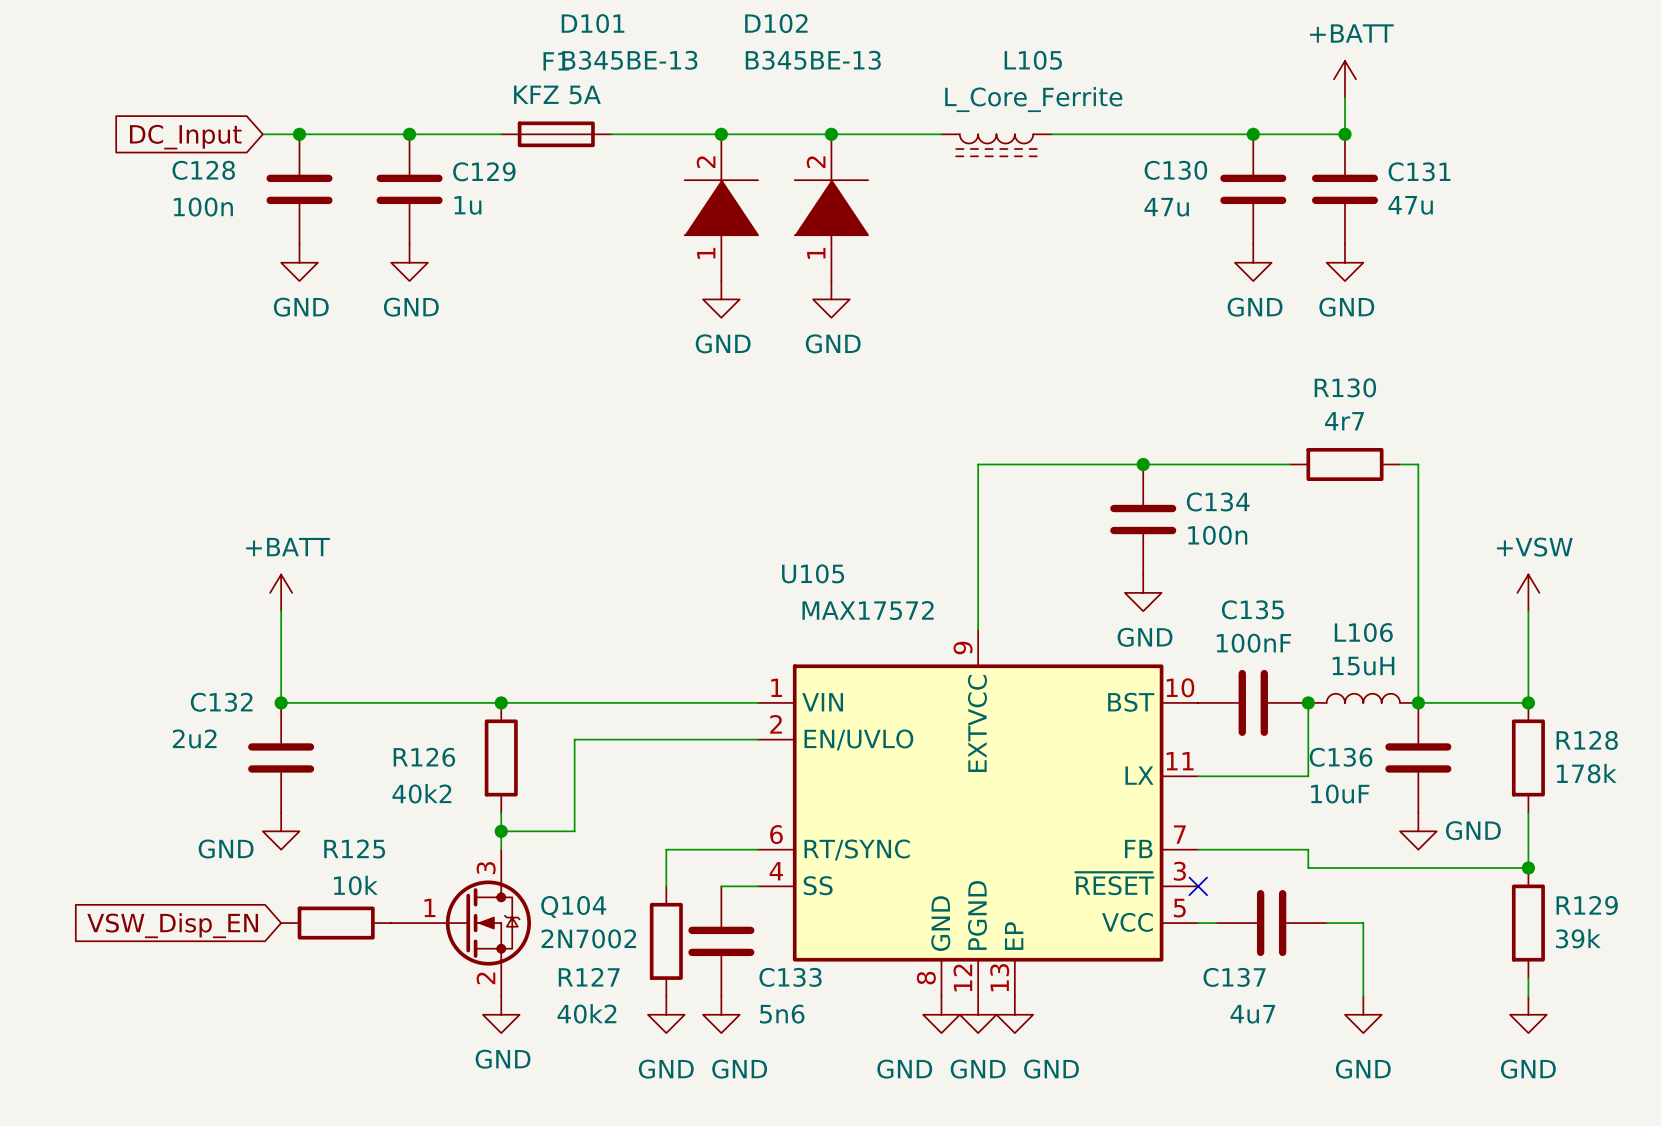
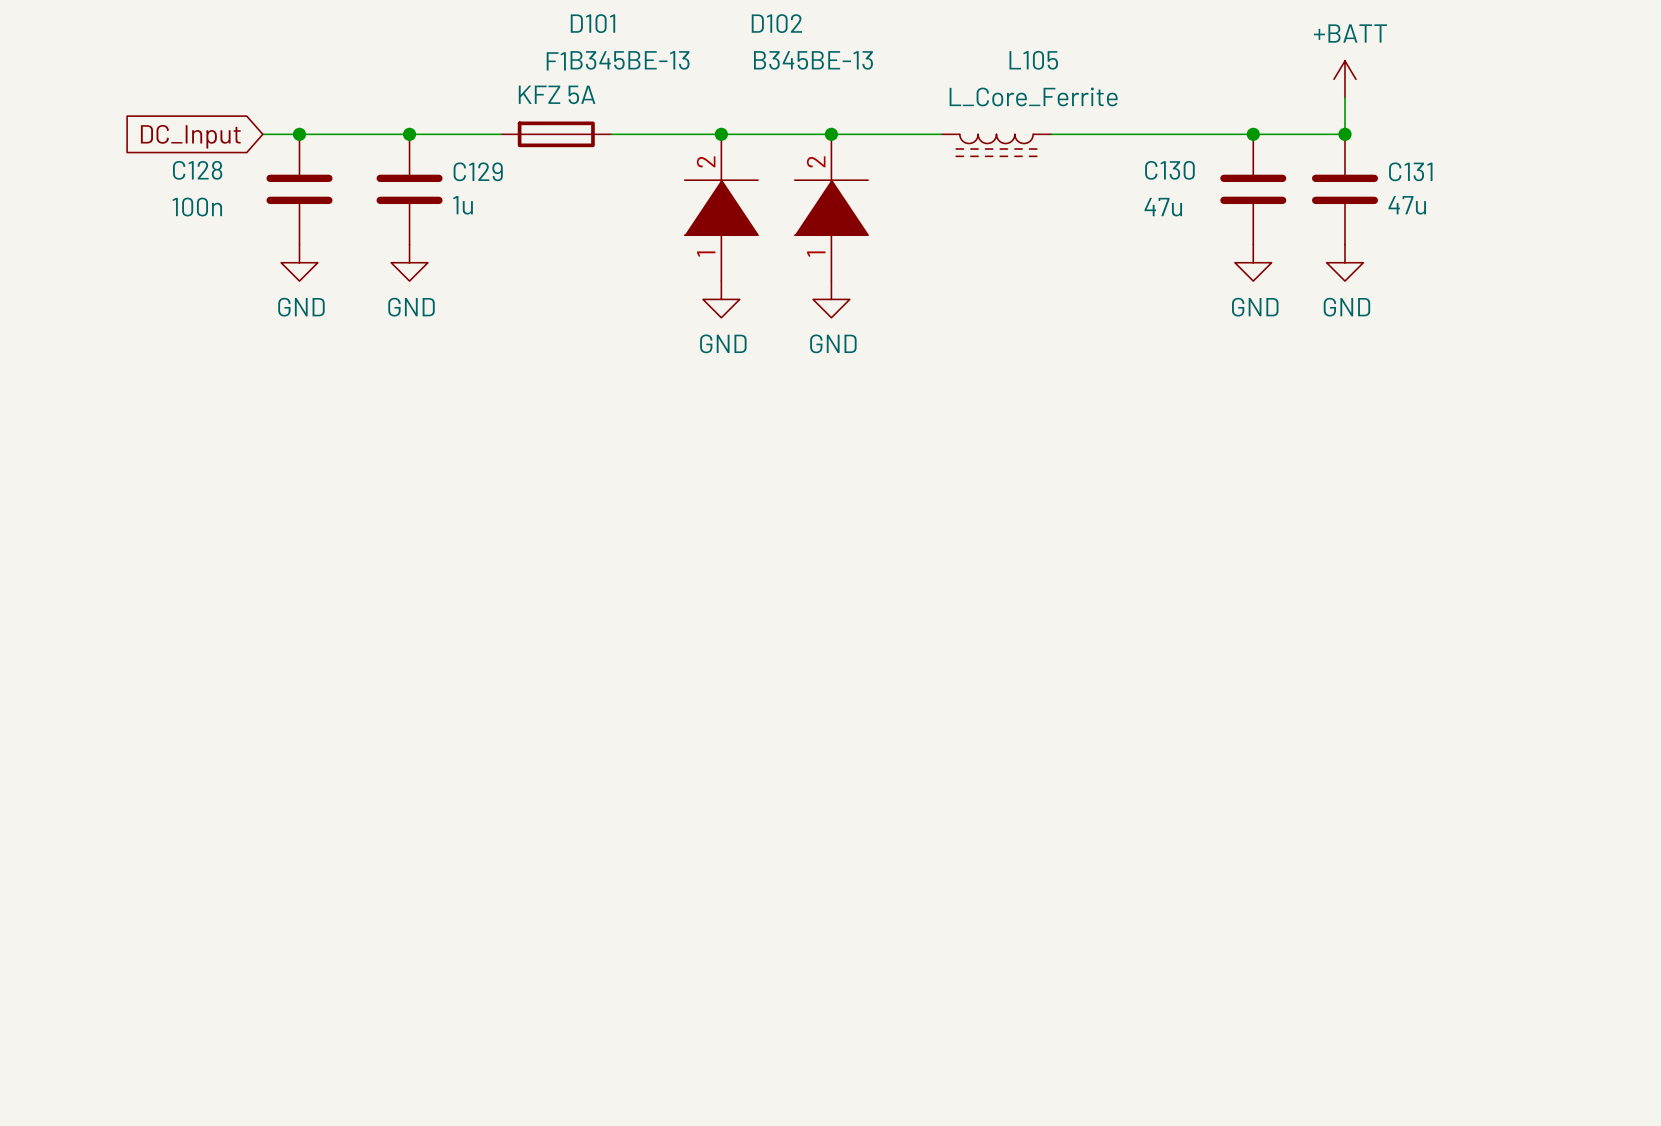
junction: (1143, 464) -> none
wire: (1289, 464) (978, 464) (978, 629) -> none
R130: 4r7 (1344, 464) -> none
wire: (1400, 464) (1418, 464) (1418, 702) (1528, 702) (1528, 611) -> none
C134: 100n (1143, 519) -> none
power symbol: +BATT (281, 592) -> none
power symbol: GND (1143, 592) -> none
power symbol: +VSW (1528, 592) -> none
wire: (281, 611) (281, 702) (758, 702) -> none
L106: 15uH (1363, 698) -> none
junction: (281, 702) -> none
junction: (501, 702) -> none
C135: 100nF (1253, 702) -> none
wire: (1308, 702) (1308, 776) (1198, 776) -> none
junction: (1308, 702) -> none
junction: (1418, 702) -> none
junction: (1528, 702) -> none
wire: (758, 739) (574, 739) (574, 831) (501, 831) -> none
C132: 2u2 (281, 757) -> none
R126: 40k2 (501, 757) -> none
C136: 10uF (1418, 757) -> none
R128: 178k (1528, 757) -> none
wire: (501, 812) (501, 849) -> none
U105: MAX17572 (978, 812) -> none
wire: (1528, 812) (1528, 868) (1308, 868) (1308, 849) (1198, 849) -> none
power symbol: GND (281, 831) -> none
junction: (501, 831) -> none
power symbol: GND (1418, 831) -> none
wire: (758, 849) (666, 849) (666, 886) -> none
junction: (1528, 868) -> none
wire: (721, 886) (758, 886) -> none
no-connect mark: (1198, 886) -> none
R125: 10k (336, 923) -> none
Q104: 2N7002 (461, 923) -> none
wire: (1198, 923) (1216, 923) -> none
C137: 4u7 (1271, 923) -> none
wire: (1326, 923) (1363, 923) (1363, 996) -> none
R129: 39k (1528, 923) -> none
global label: VSW_Disp_EN (172, 925) -> none
R127: 40k2 (666, 941) -> none
C133: 5n6 (721, 941) -> none
wire: (1528, 978) (1528, 996) -> none
power symbol: GND (501, 1014) -> none
power symbol: GND (666, 1014) -> none
power symbol: GND (721, 1014) -> none
power symbol: GND (941, 1014) -> none
power symbol: GND (978, 1014) -> none
power symbol: GND (1014, 1014) -> none
power symbol: GND (1363, 1014) -> none
power symbol: GND (1528, 1014) -> none

